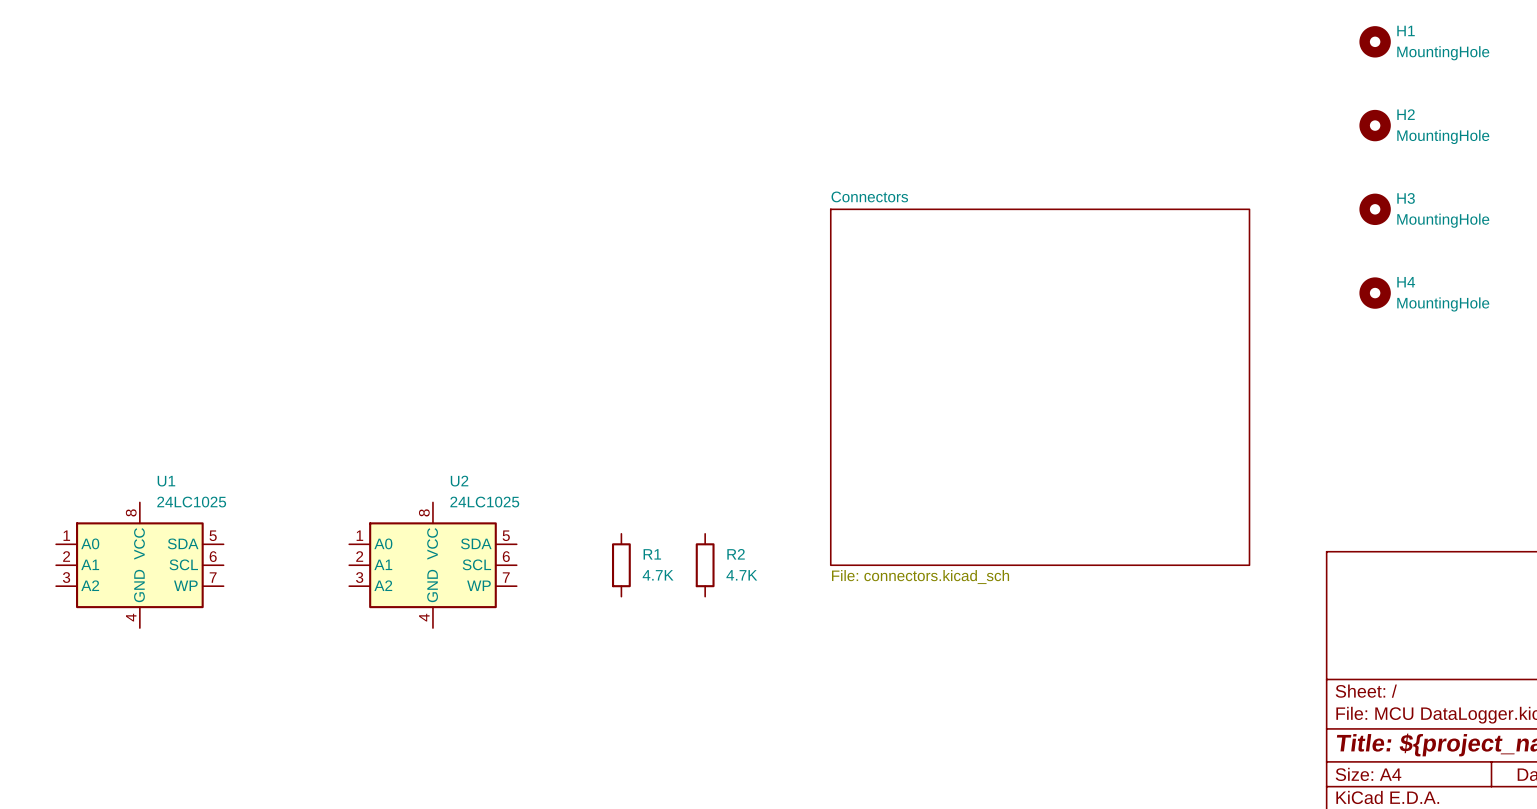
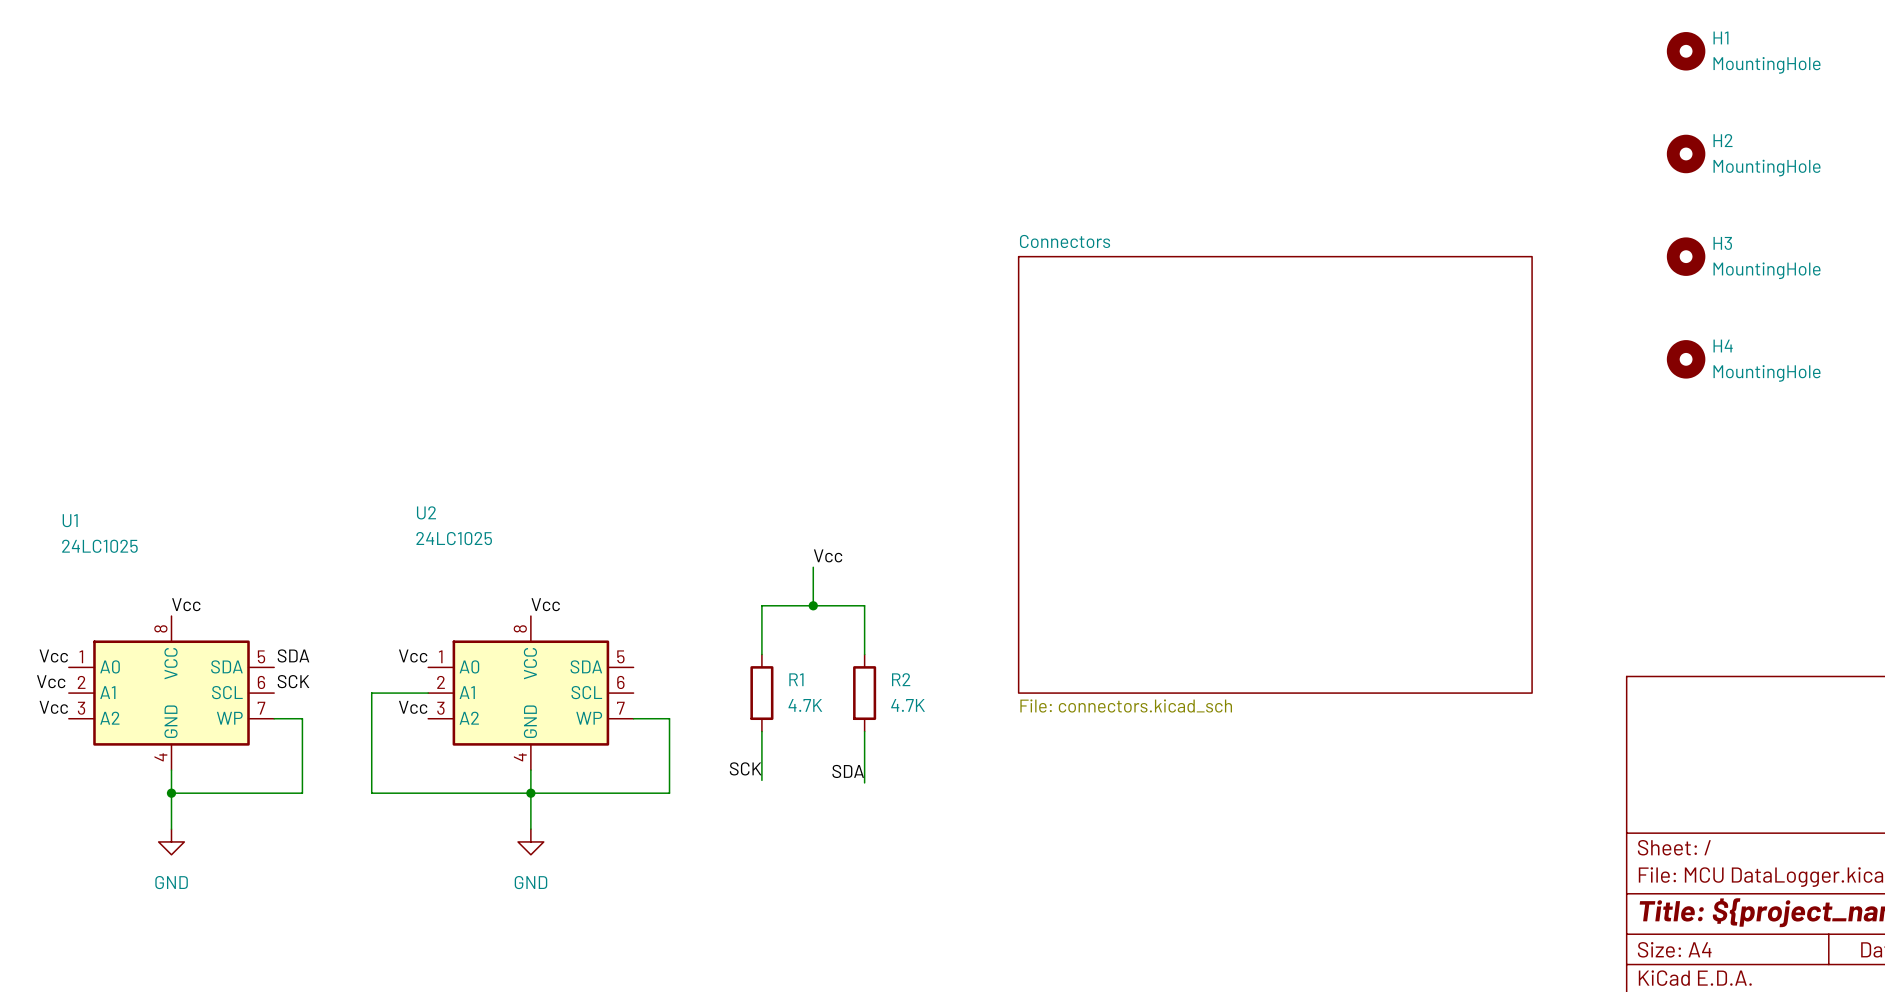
label: none -> Vcc (828, 555)
wire: none -> (813, 567) (813, 605)
U1 name position: U1 (166, 481) -> U1 (70, 520)
U2 name position: U2 (459, 481) -> U2 (426, 512)
label: none -> Vcc (186, 604)
label: none -> Vcc (545, 604)
junction: none -> (813, 605)
U1 value position: 24LC1025 (191, 502) -> 24LC1025 (99, 546)
U2 value position: 24LC1025 (484, 502) -> 24LC1025 (454, 538)
wire: none -> (761, 654) (761, 605) (864, 605) (864, 654)
label: none -> SDA (293, 655)
label: none -> Vcc (53, 656)
label: none -> Vcc (413, 656)
label: none -> Vcc (51, 681)
label: none -> SCK (293, 681)
wire: none -> (428, 693) (371, 693) (371, 793) (669, 793) (669, 718) (633, 718)
label: none -> Vcc (53, 707)
label: none -> Vcc (413, 707)
wire: none -> (274, 718) (302, 718) (302, 793) (171, 793)
wire: none -> (761, 731) (761, 780)
wire: none -> (864, 731) (864, 782)
label: none -> SCK (745, 768)
wire: none -> (171, 770) (171, 829)
wire: none -> (530, 770) (530, 829)
label: none -> SDA (848, 771)
junction: none -> (171, 793)
junction: none -> (530, 793)
power symbol: none -> GND (171, 841)
power symbol: none -> GND (530, 841)

